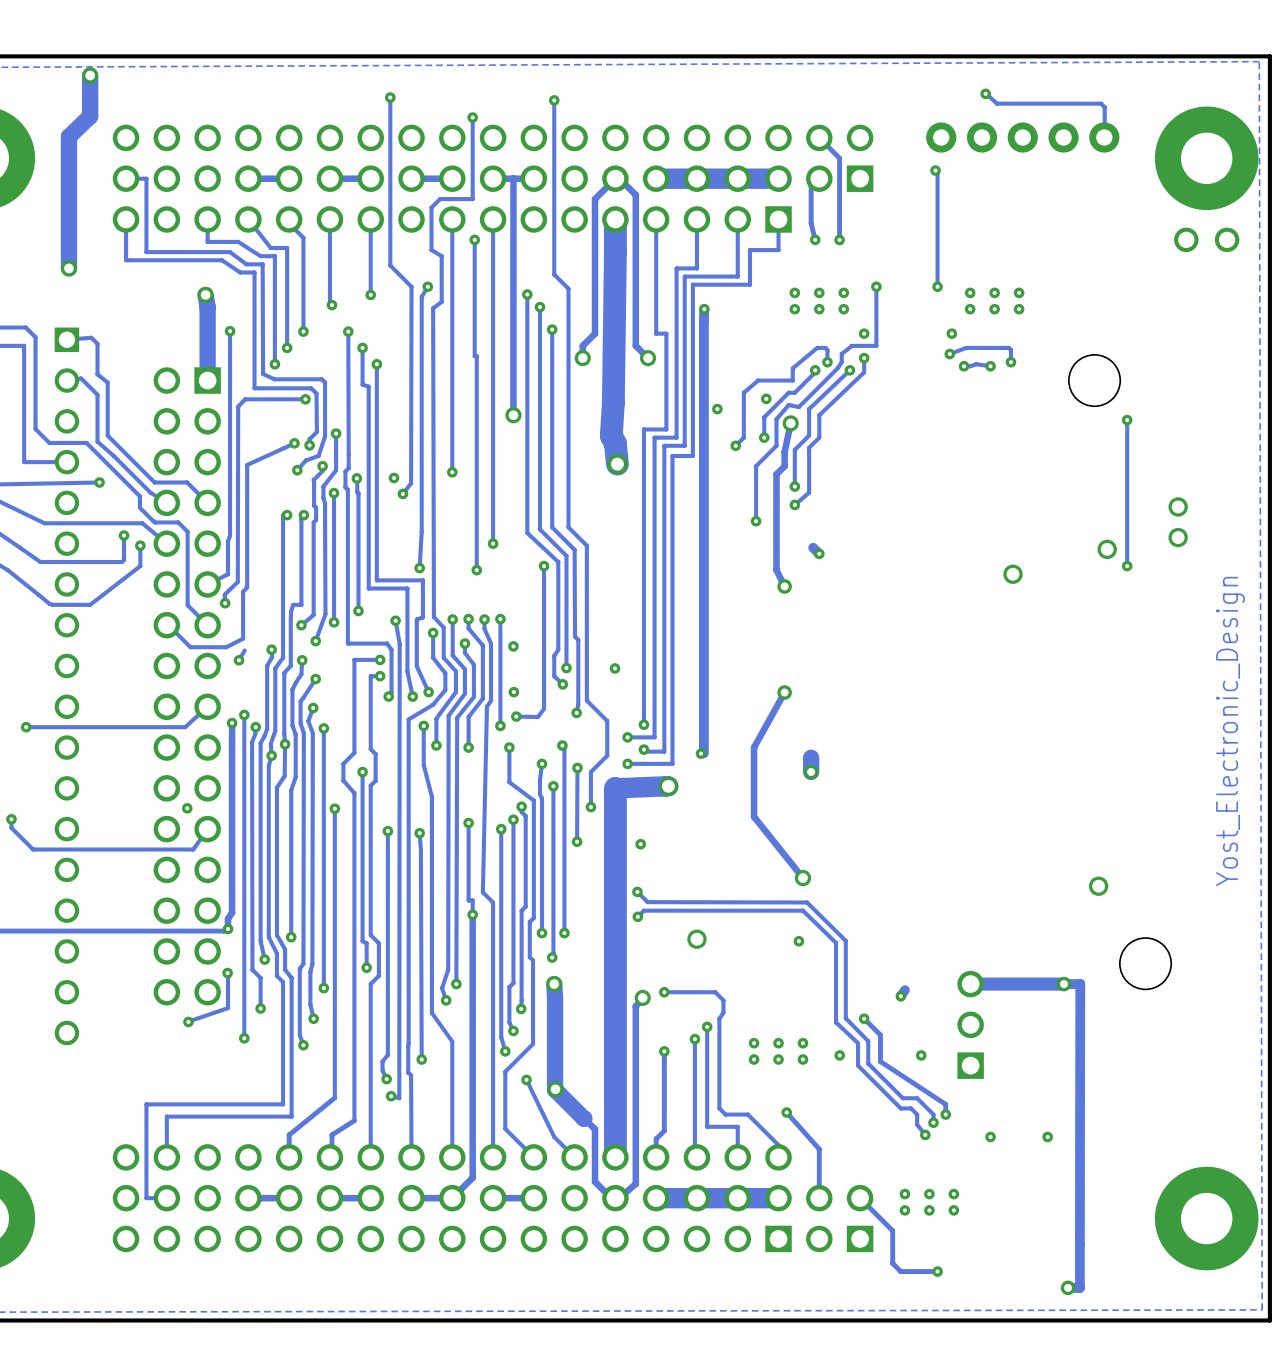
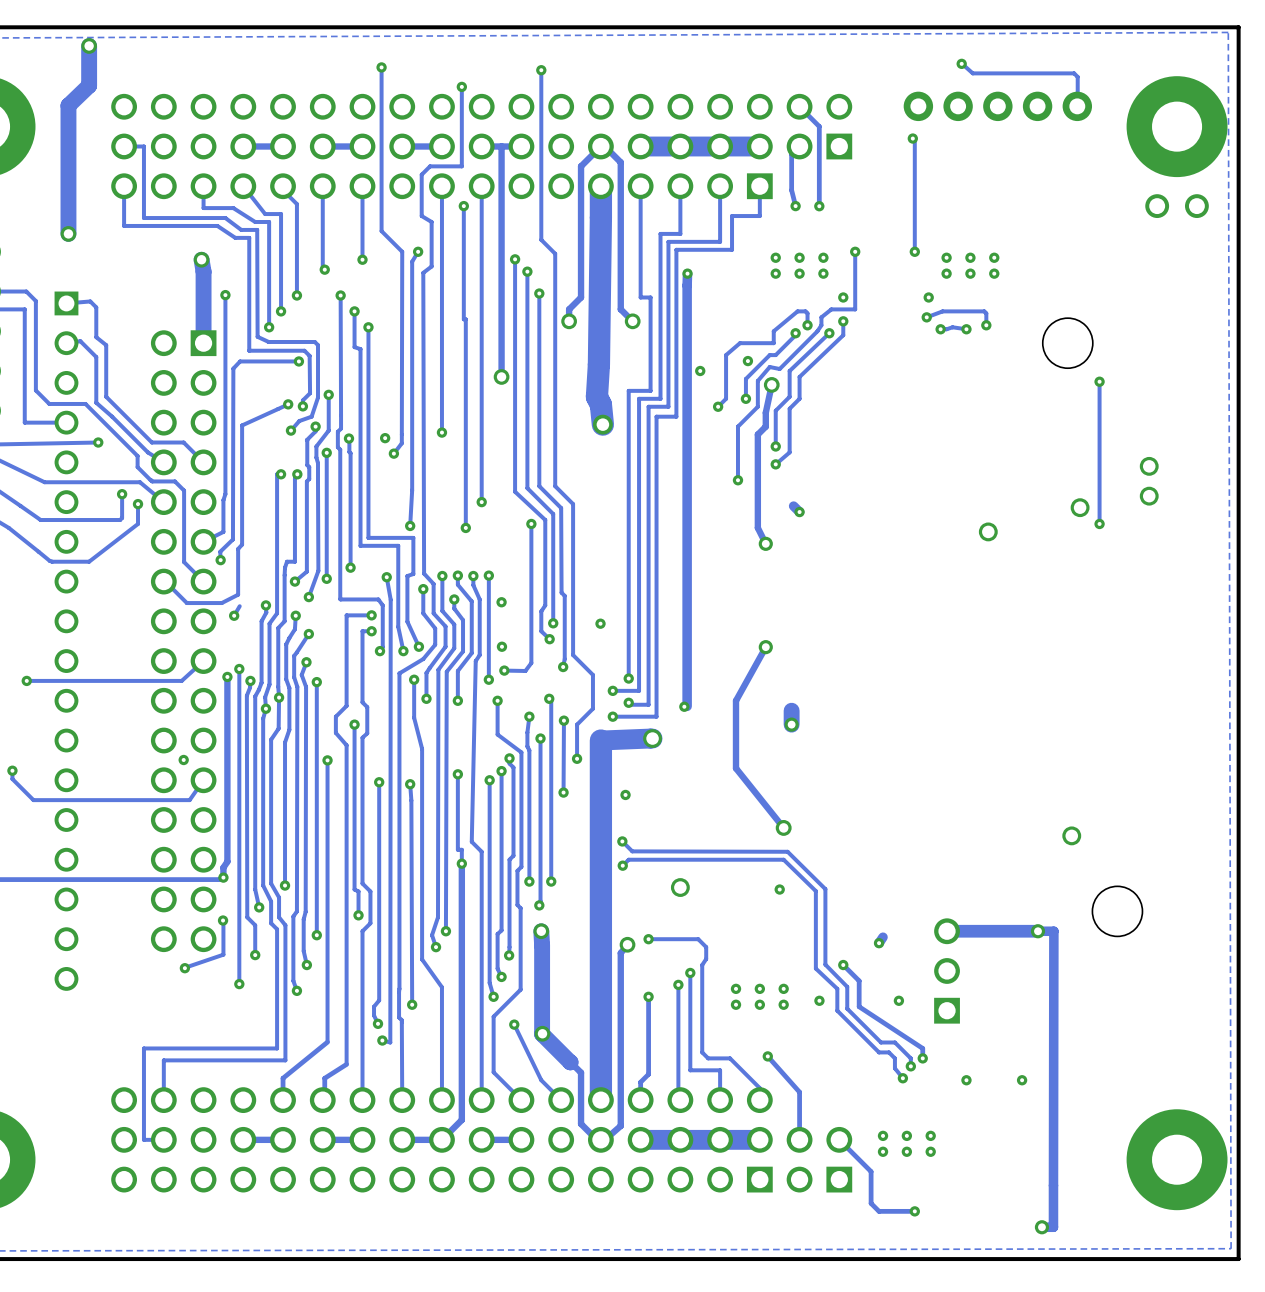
text: Yost_Electronic_Design (1230, 731) -> none

